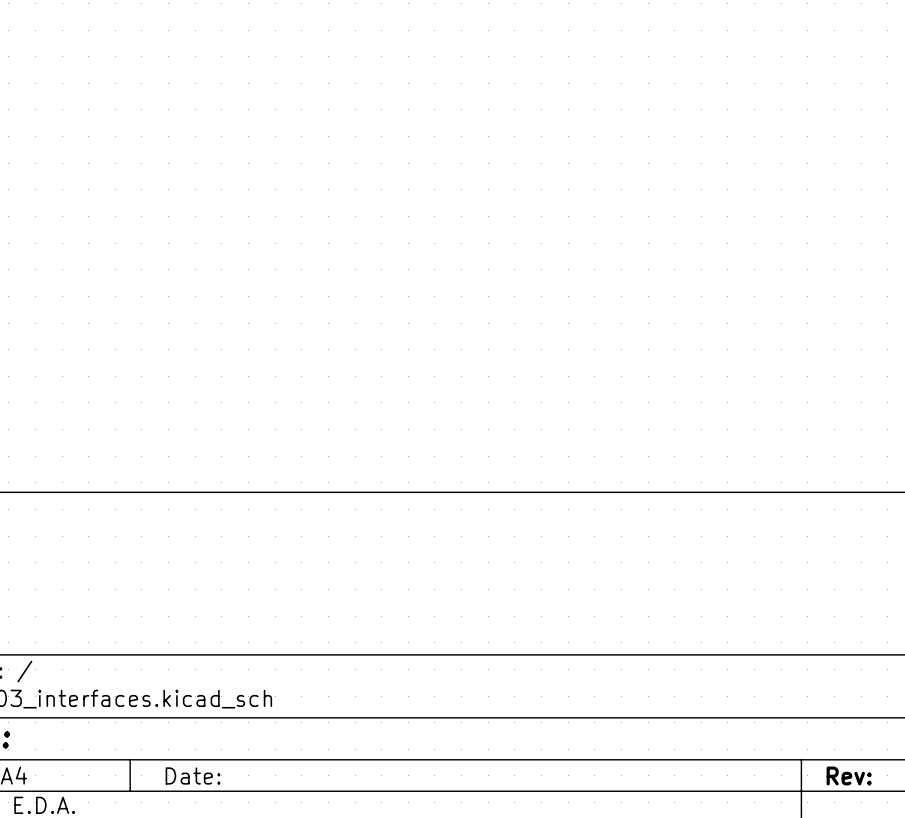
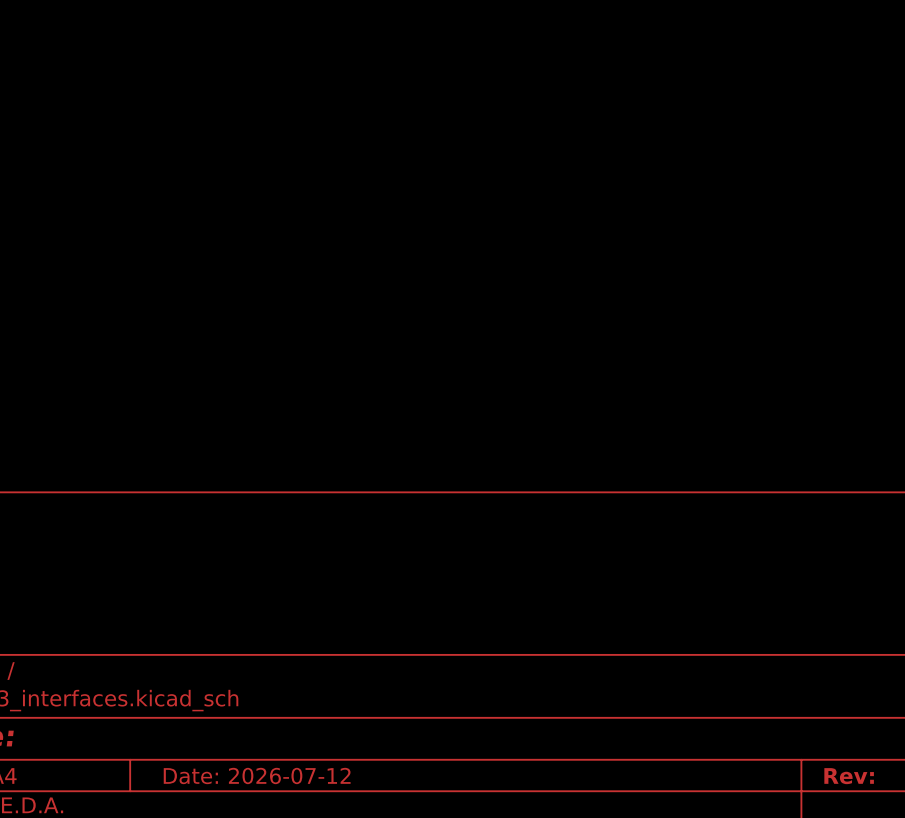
title block: Date: (193, 775) -> Date: 2026-07-12 (257, 775)

